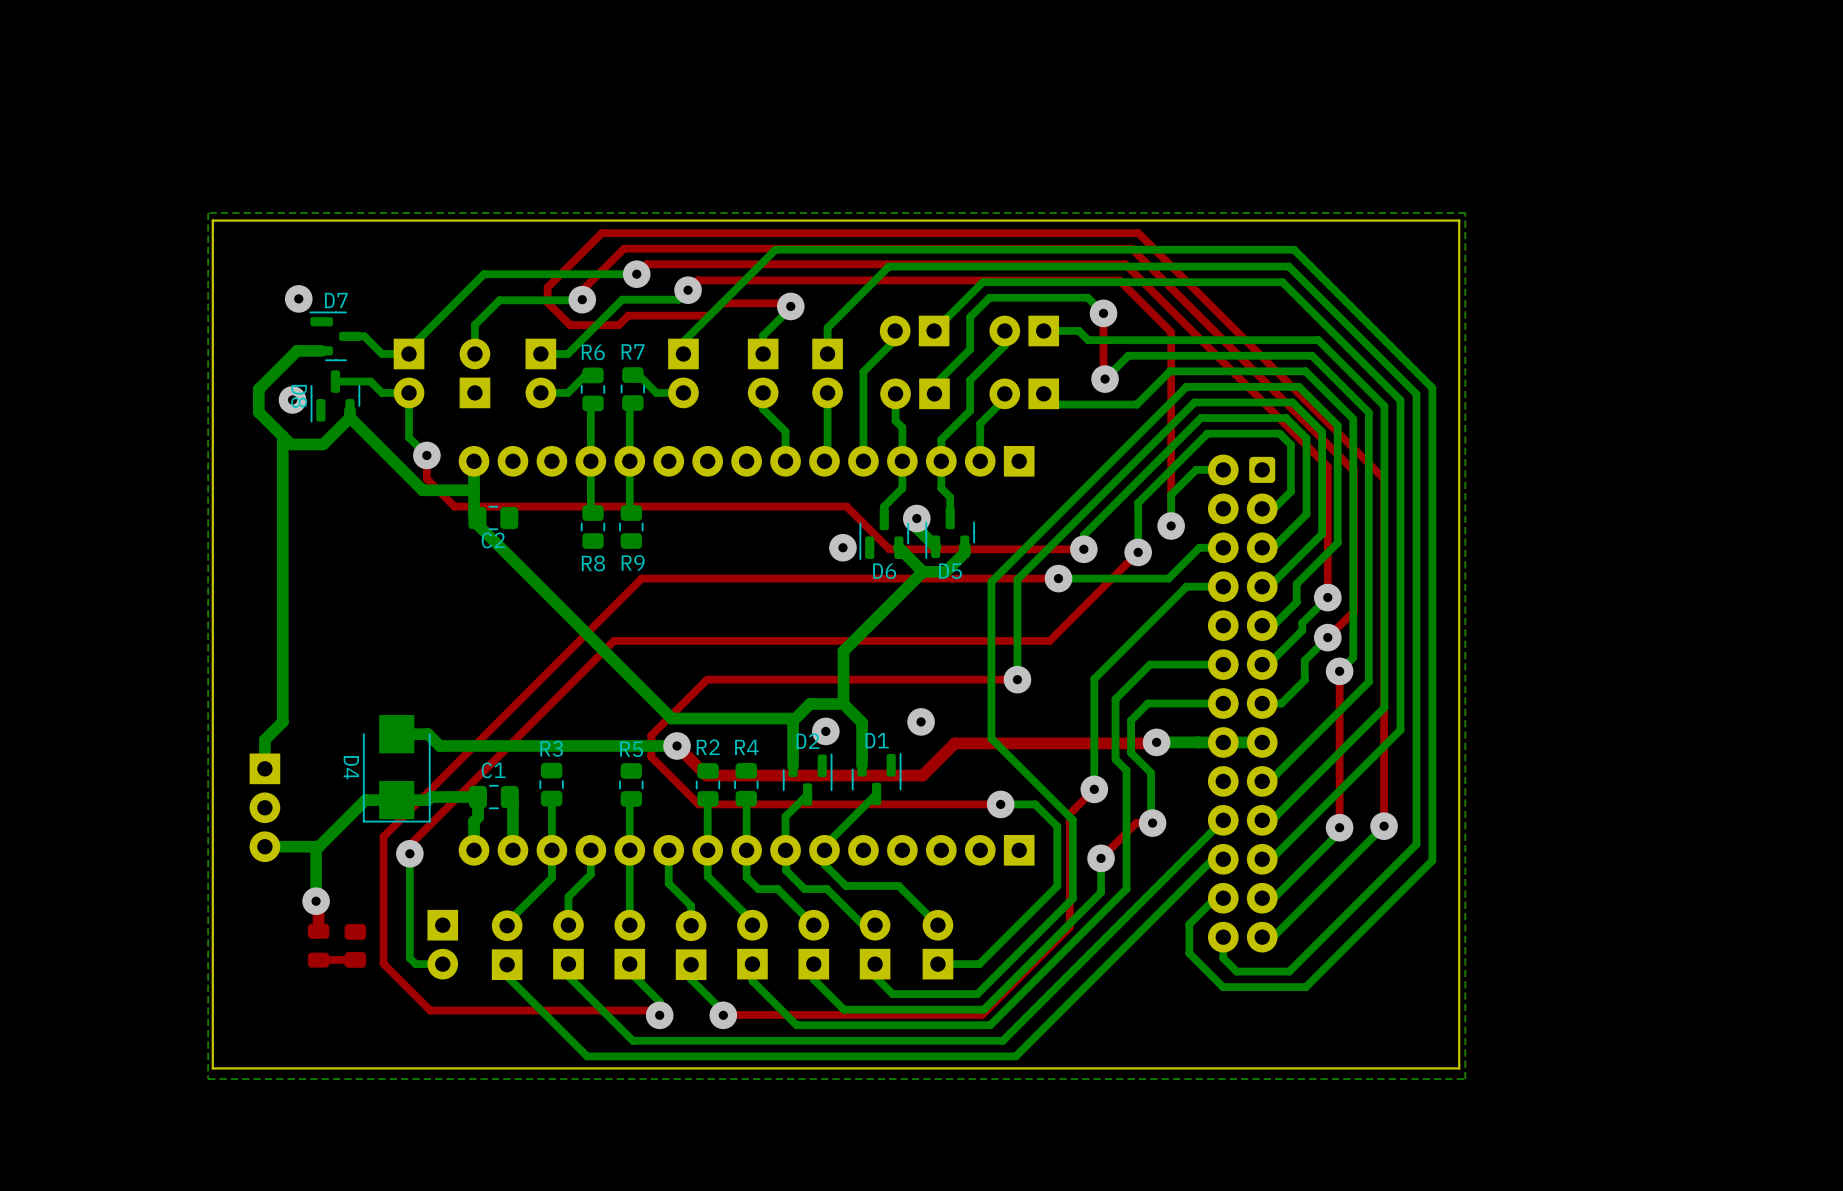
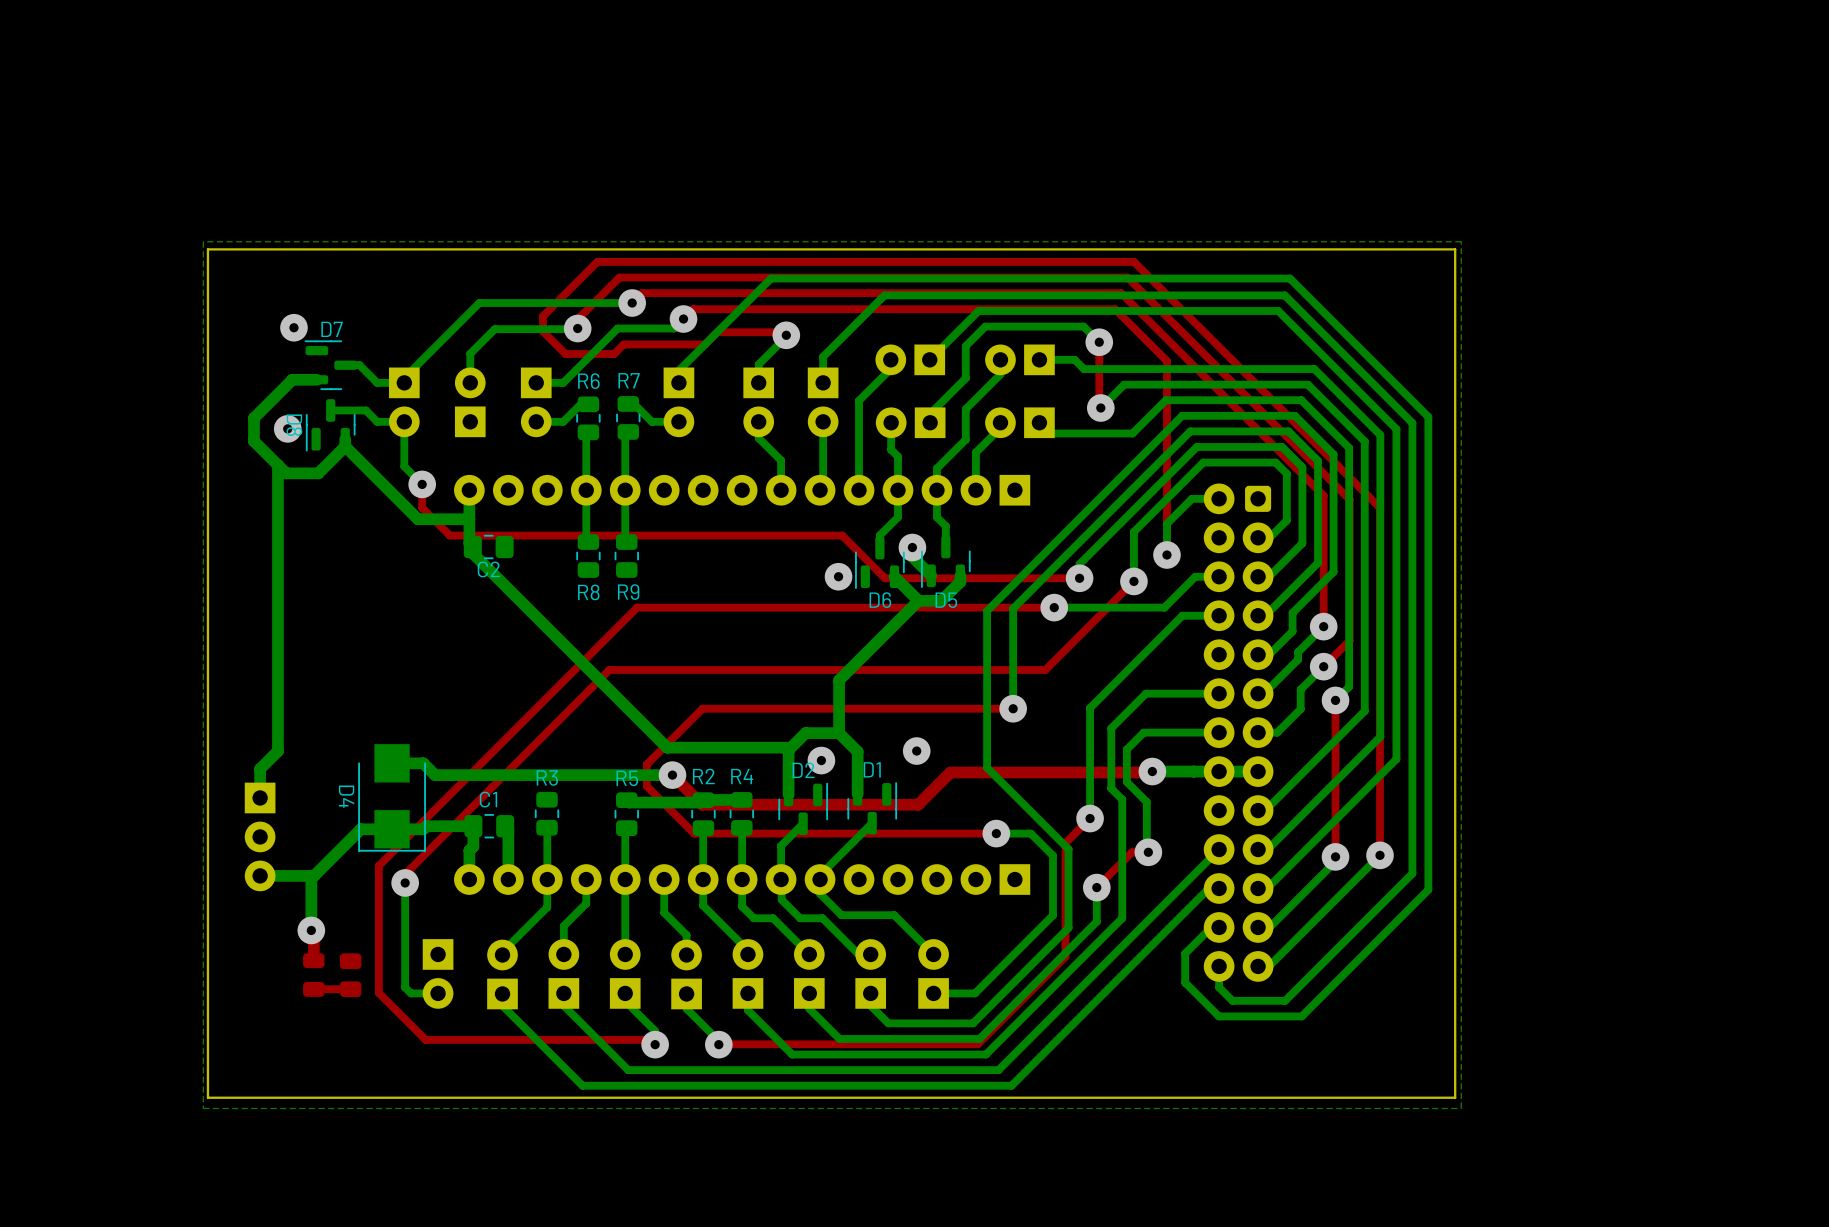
bottom track: none -> (741, 799) (703, 799) (701, 802) (629, 802) (626, 800)

